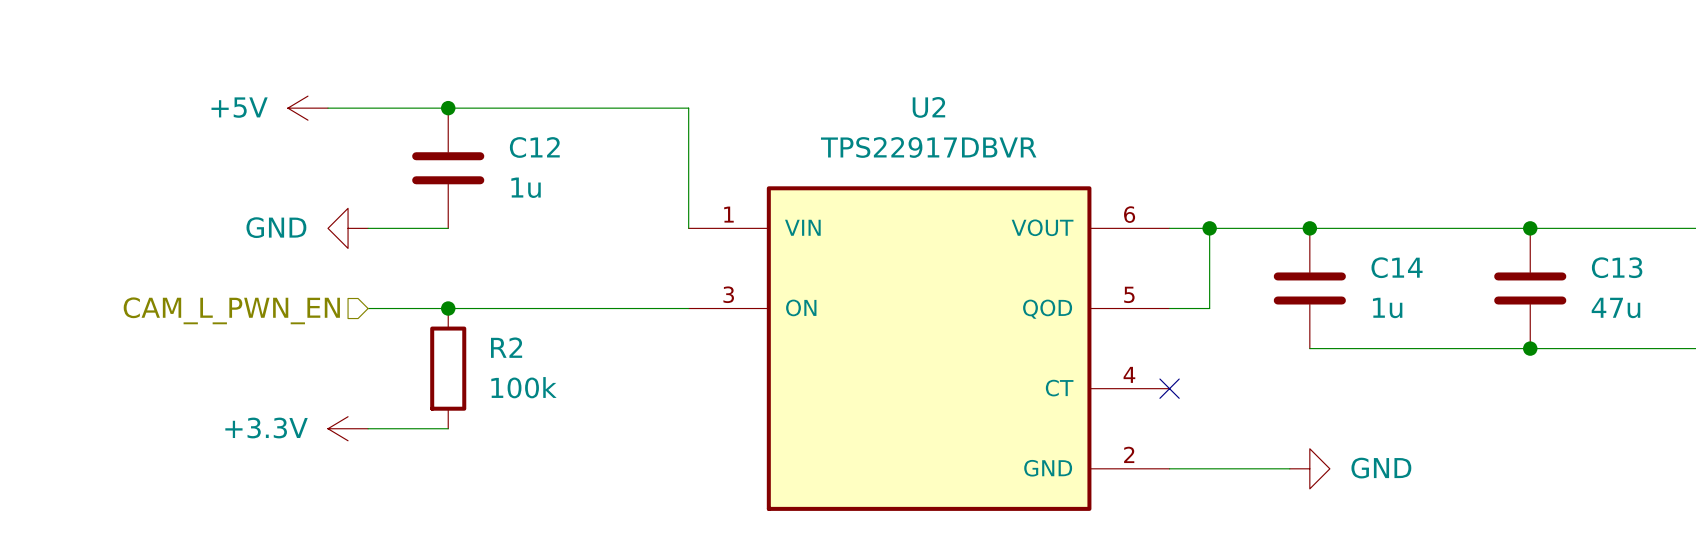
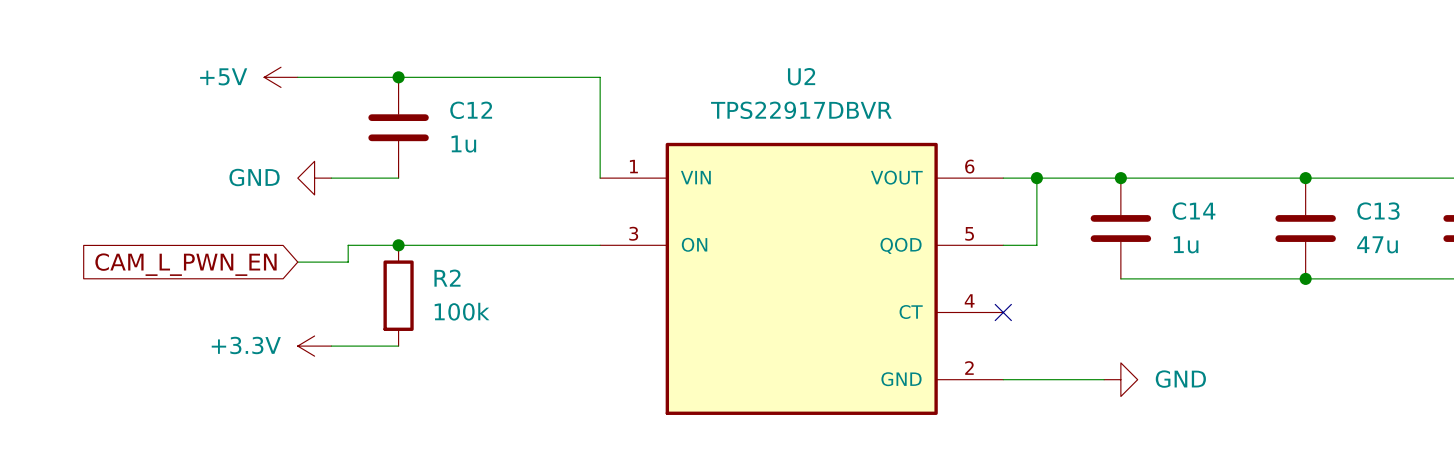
wire: (368, 308) (388, 308) -> (297, 262) (348, 262) (348, 245)
hierarchical label: CAM_L_PWN_EN (231, 310) -> none
global label: none -> CAM_L_PWN_EN (186, 264)

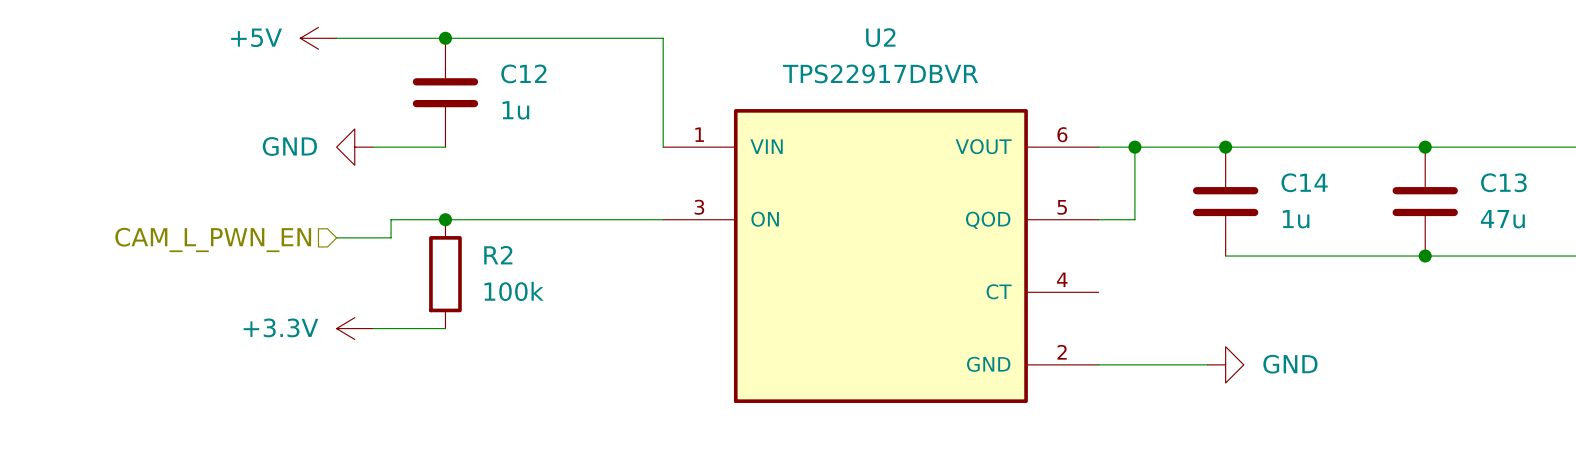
hierarchical label: none -> CAM_L_PWN_EN (213, 239)
global label: CAM_L_PWN_EN (186, 264) -> none
no-connect mark: (1003, 312) -> none

